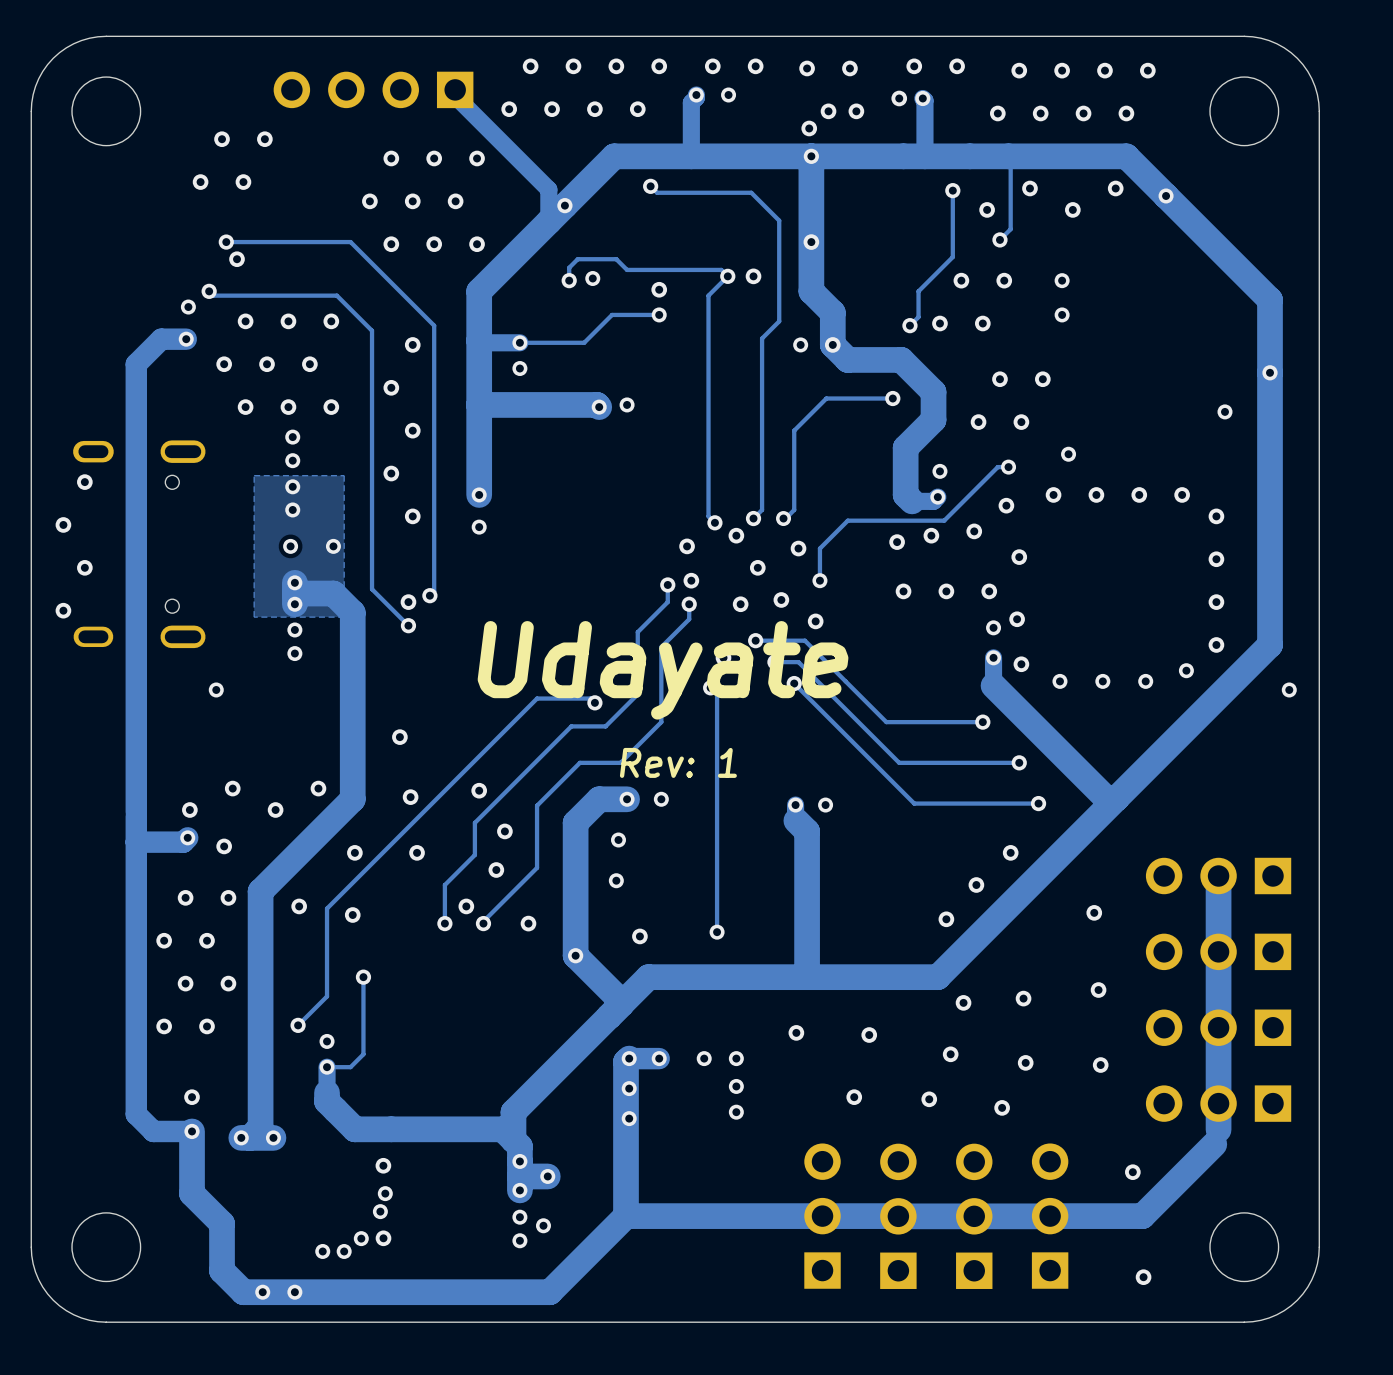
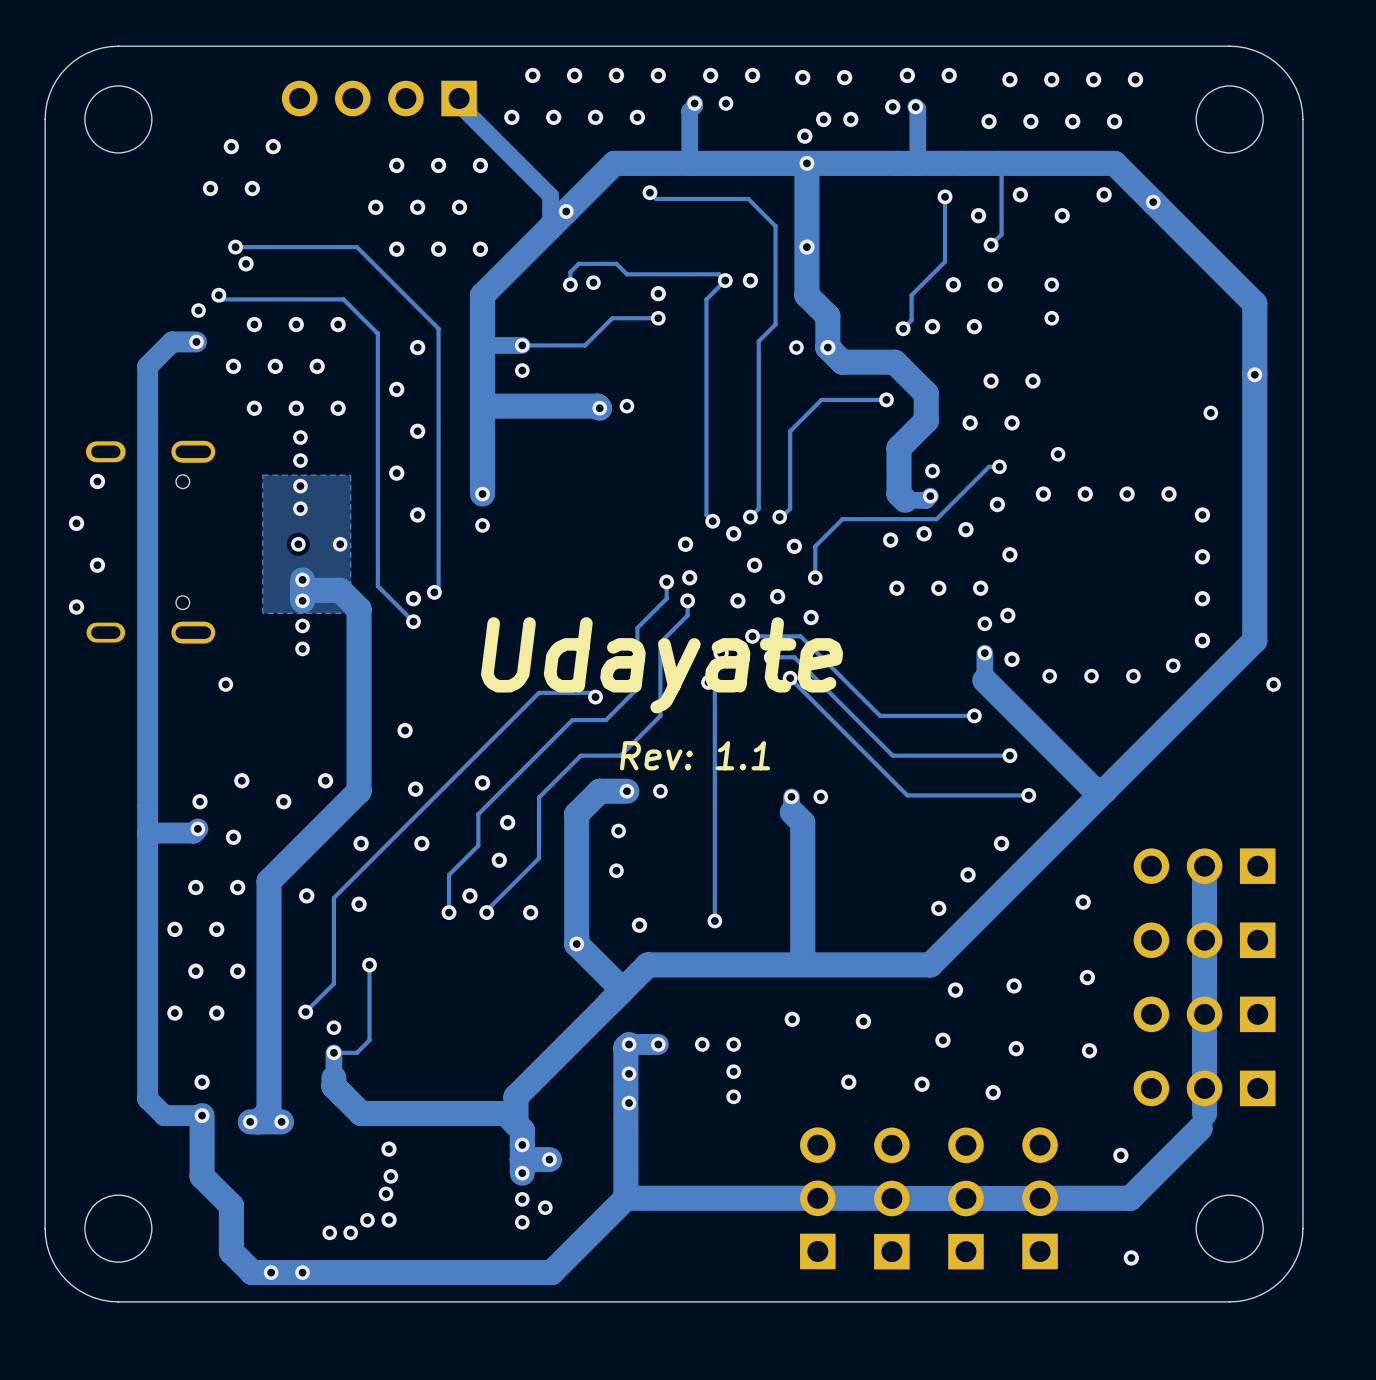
text: Rev: 1 (678, 762) -> Rev: 1.1 (695, 755)

